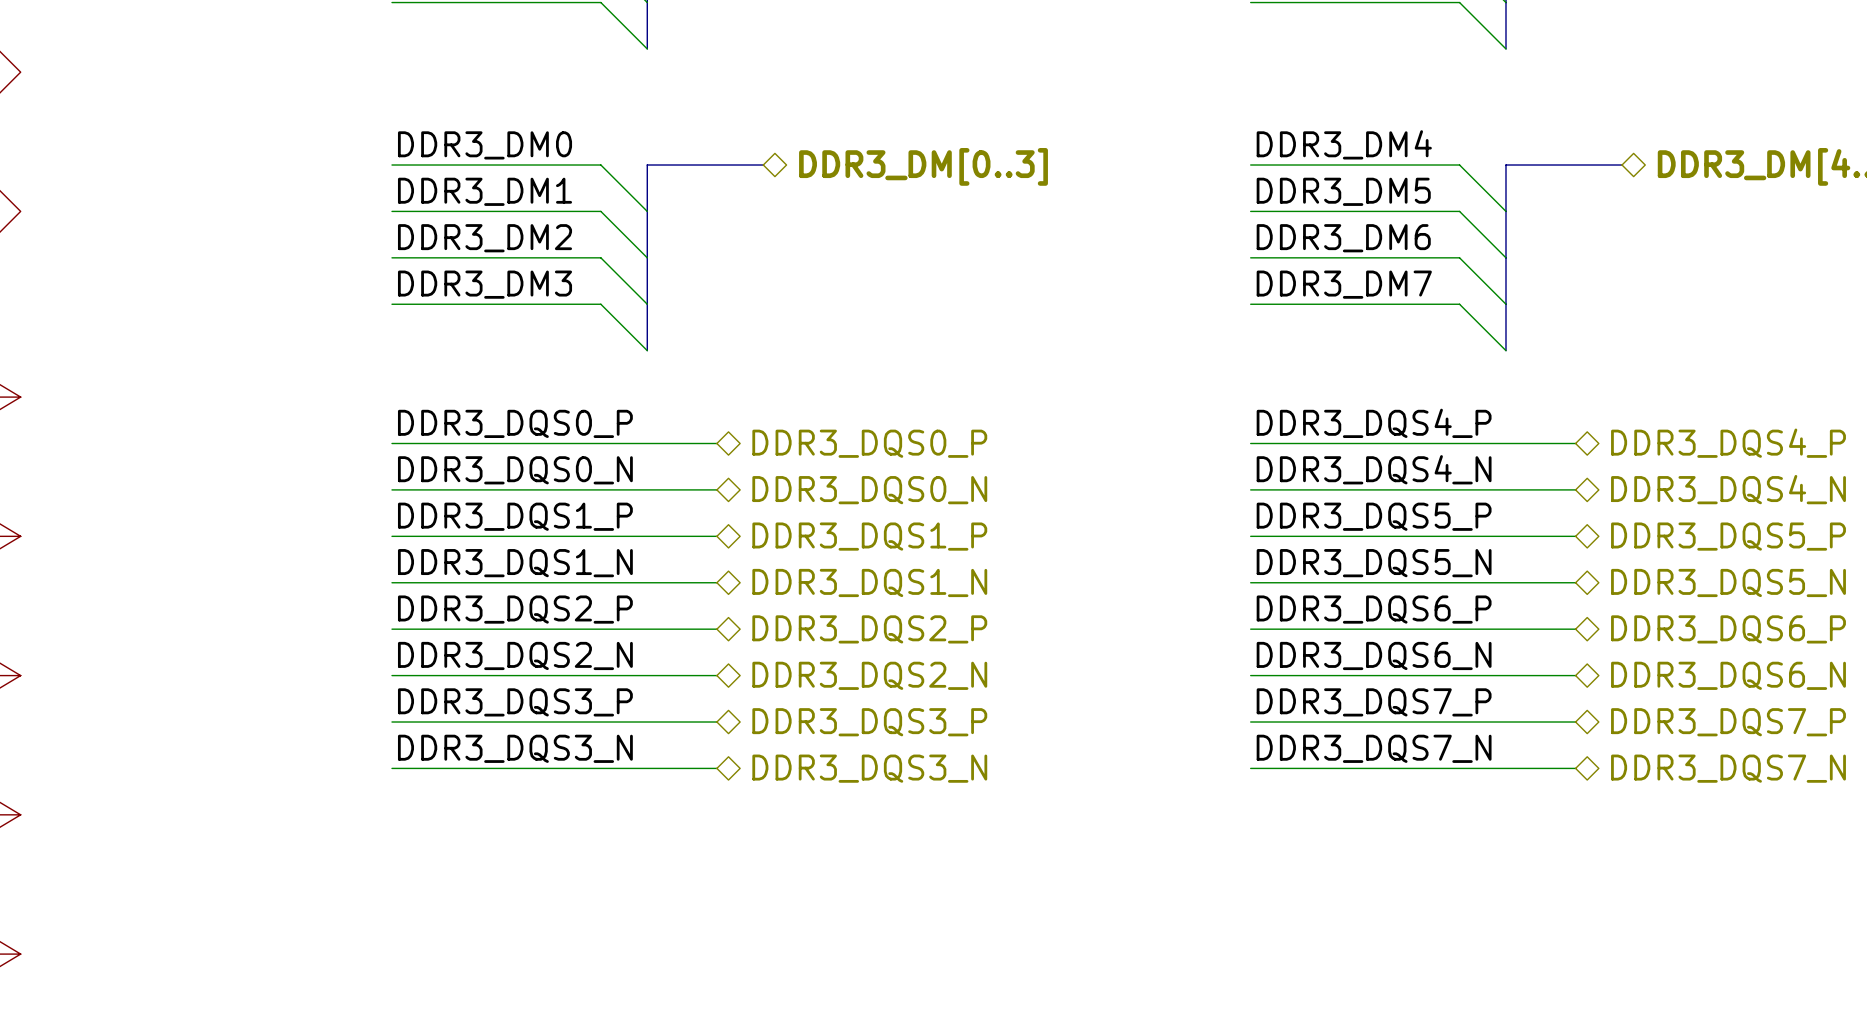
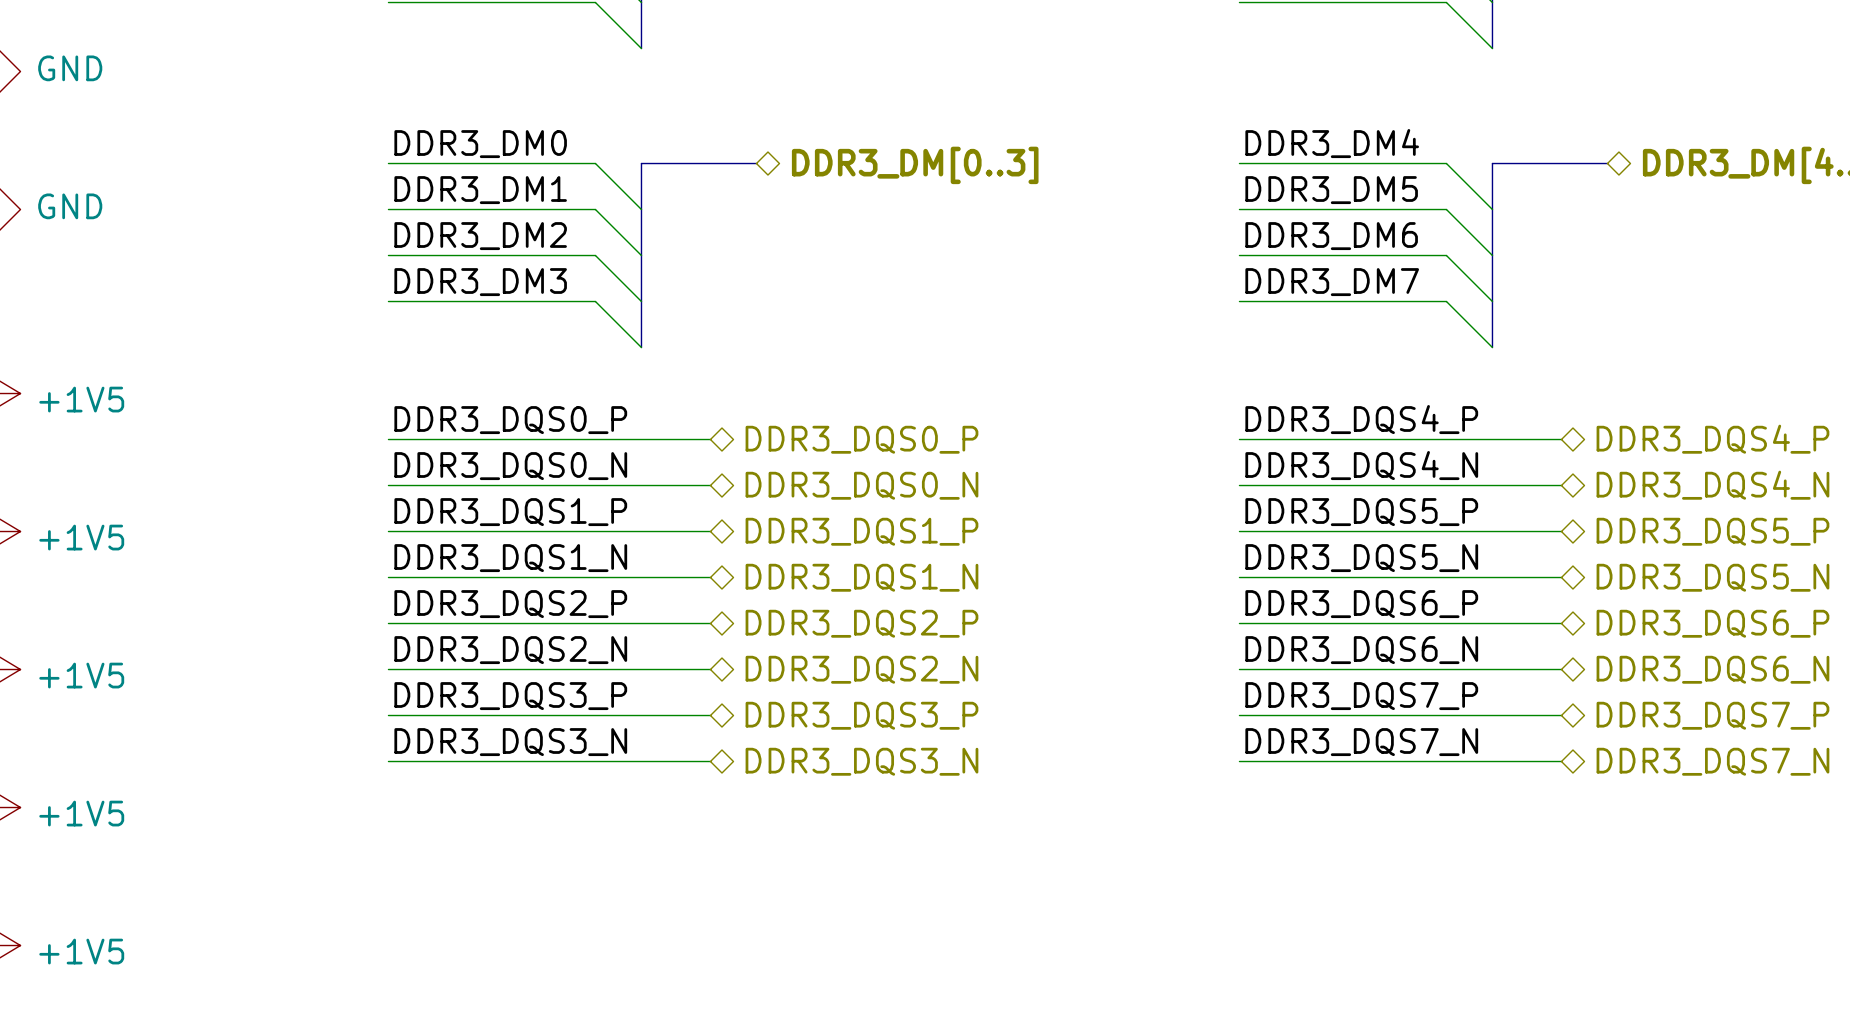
power symbol text: none -> GND (70, 68)
power symbol text: none -> GND (70, 206)
power symbol text: none -> +1V5 (81, 399)
power symbol text: none -> +1V5 (81, 537)
power symbol text: none -> +1V5 (81, 675)
power symbol text: none -> +1V5 (81, 813)
power symbol text: none -> +1V5 (81, 951)

